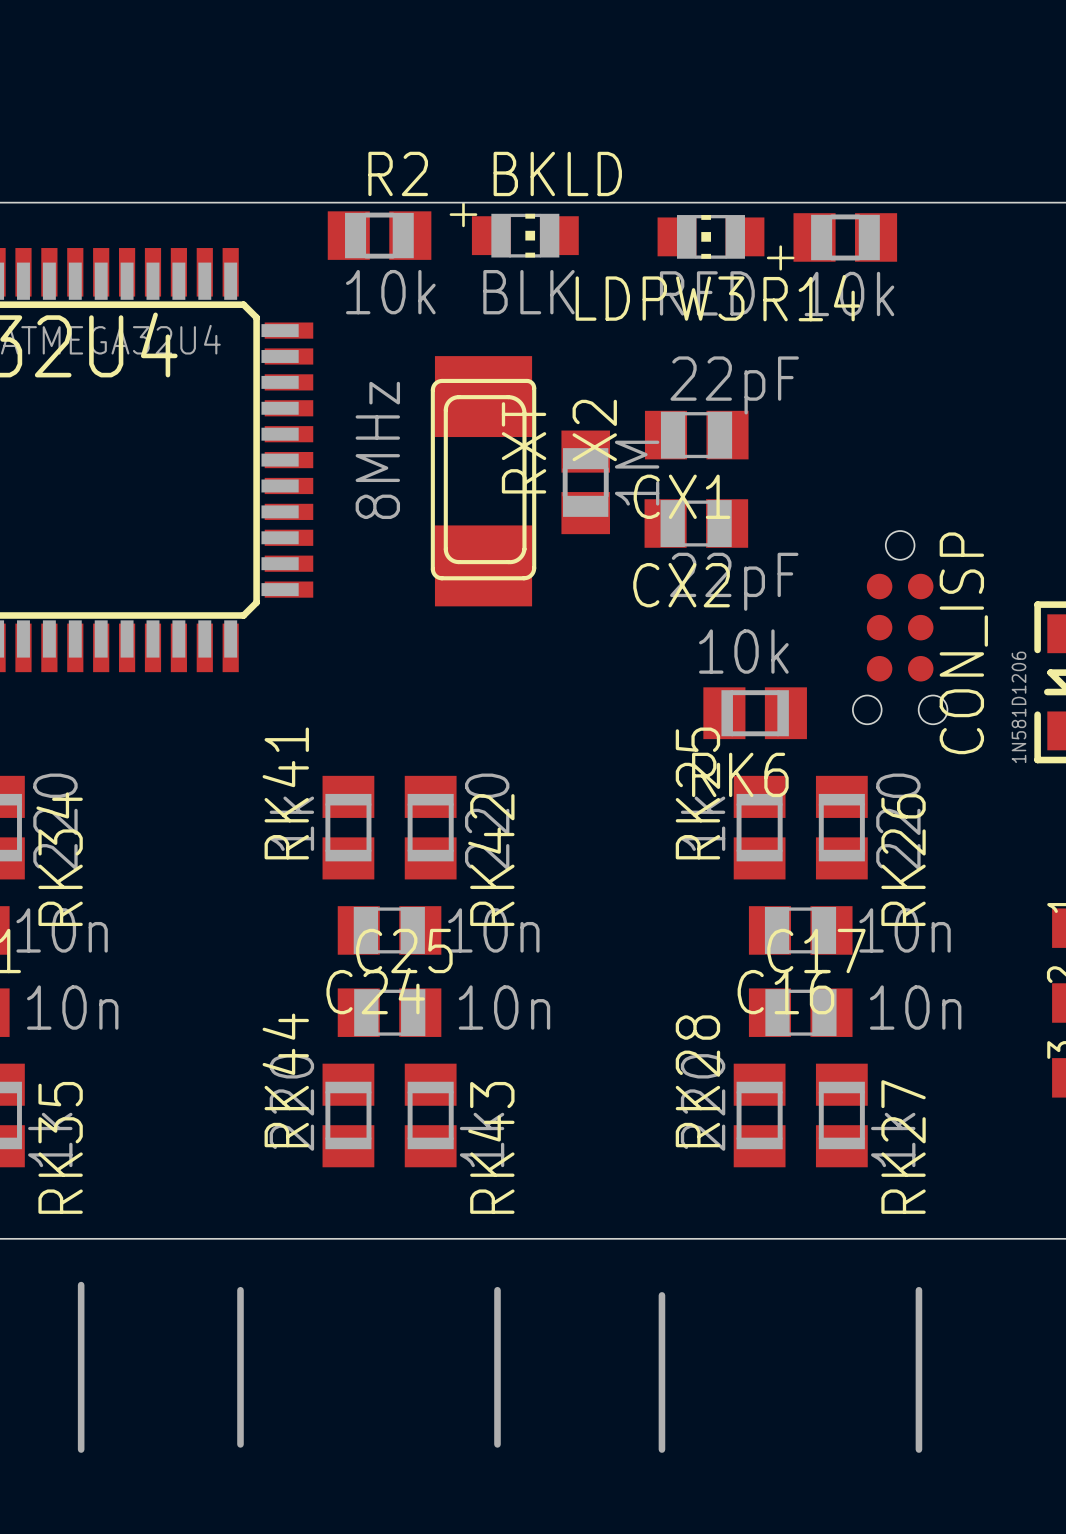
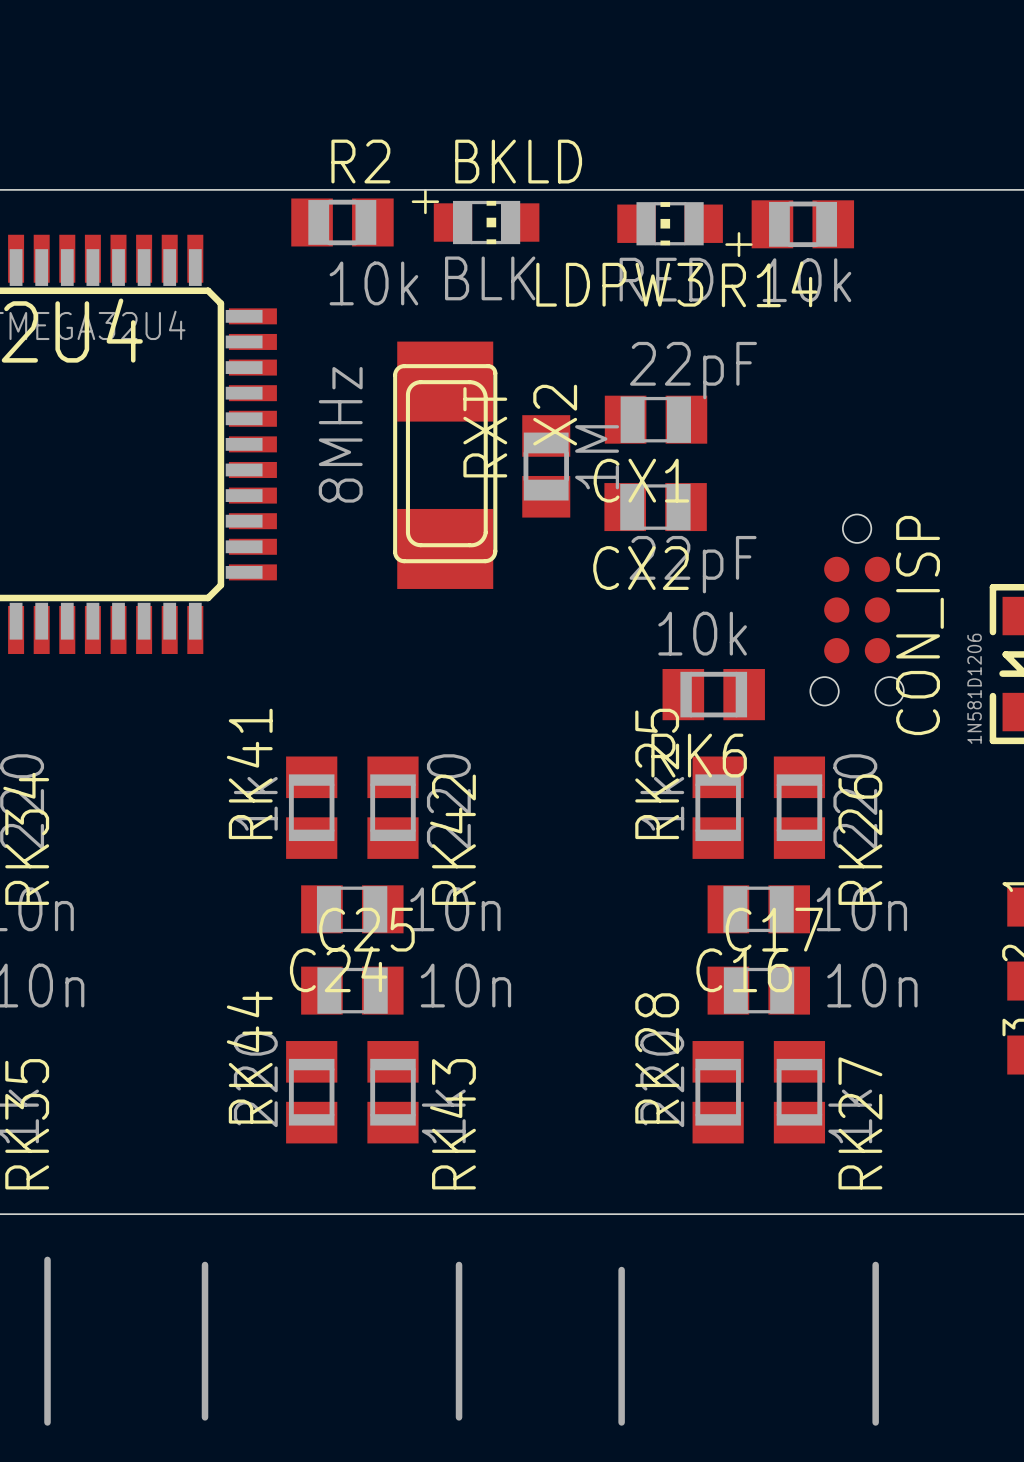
R2 value position: 10k (390, 292) -> 10k (373, 283)

